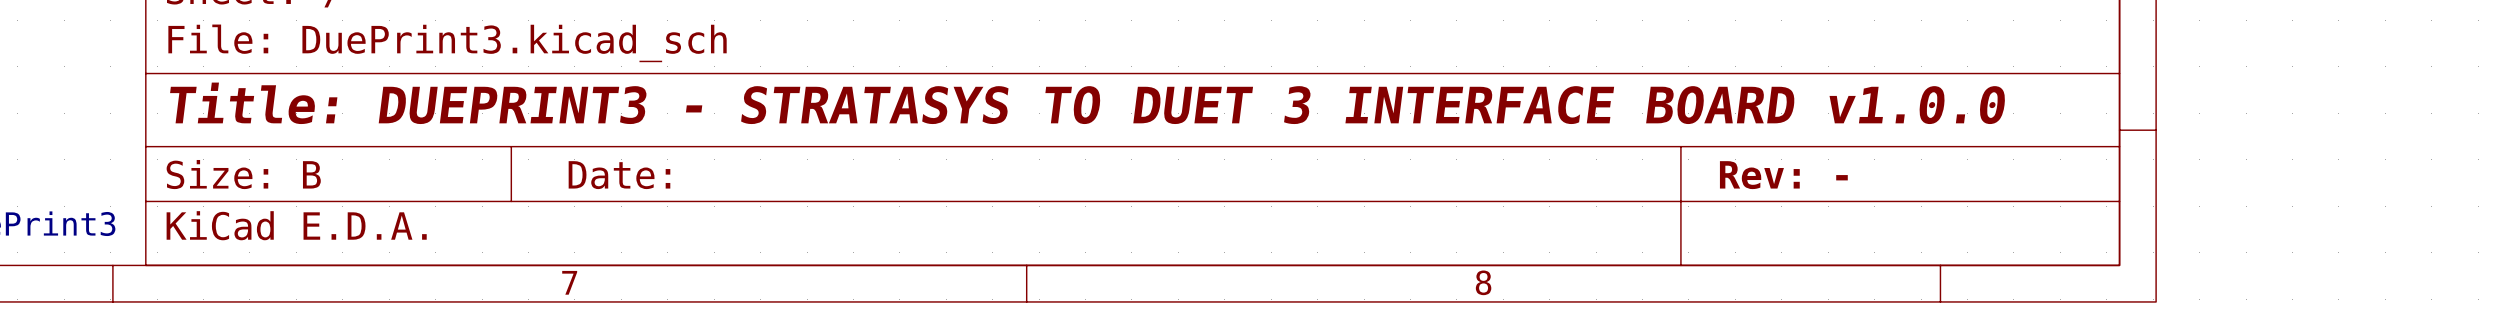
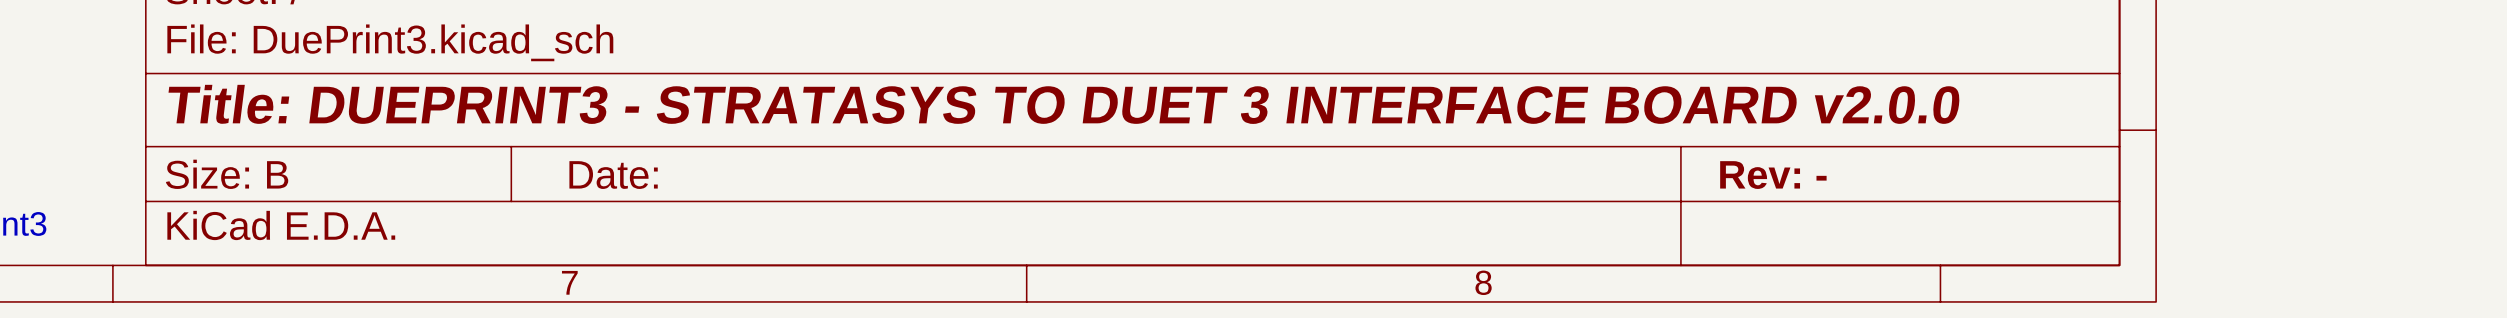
title block: Title: DUEPRINT3 - STRATASYS TO DUET 3 INTERFACE BOARD v1.0.0 (1087, 103) -> Title: DUEPRINT3 - STRATASYS TO DUET 3 INTERFACE BOARD v2.0.0 (1064, 104)

